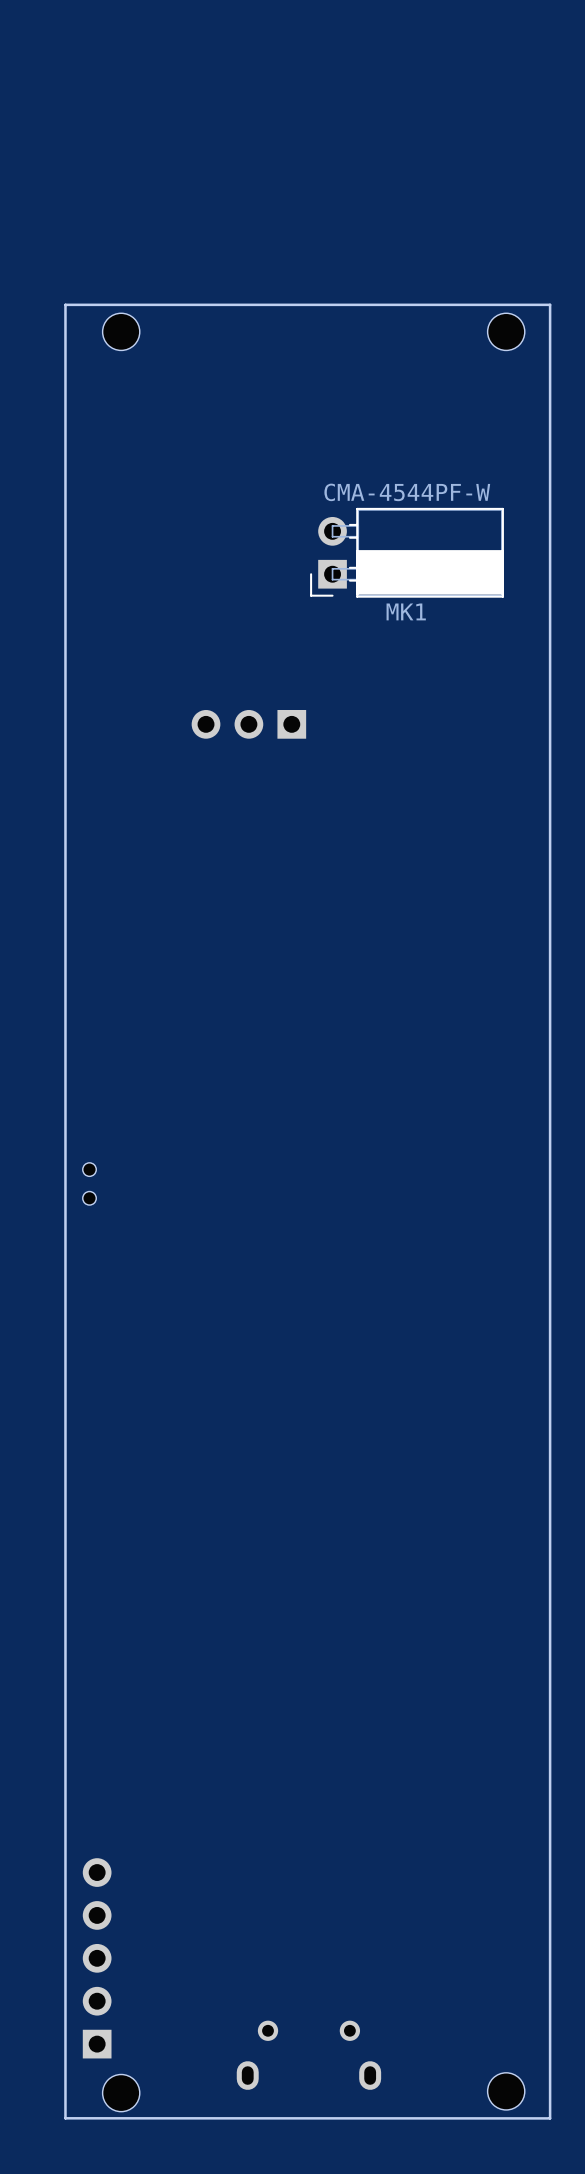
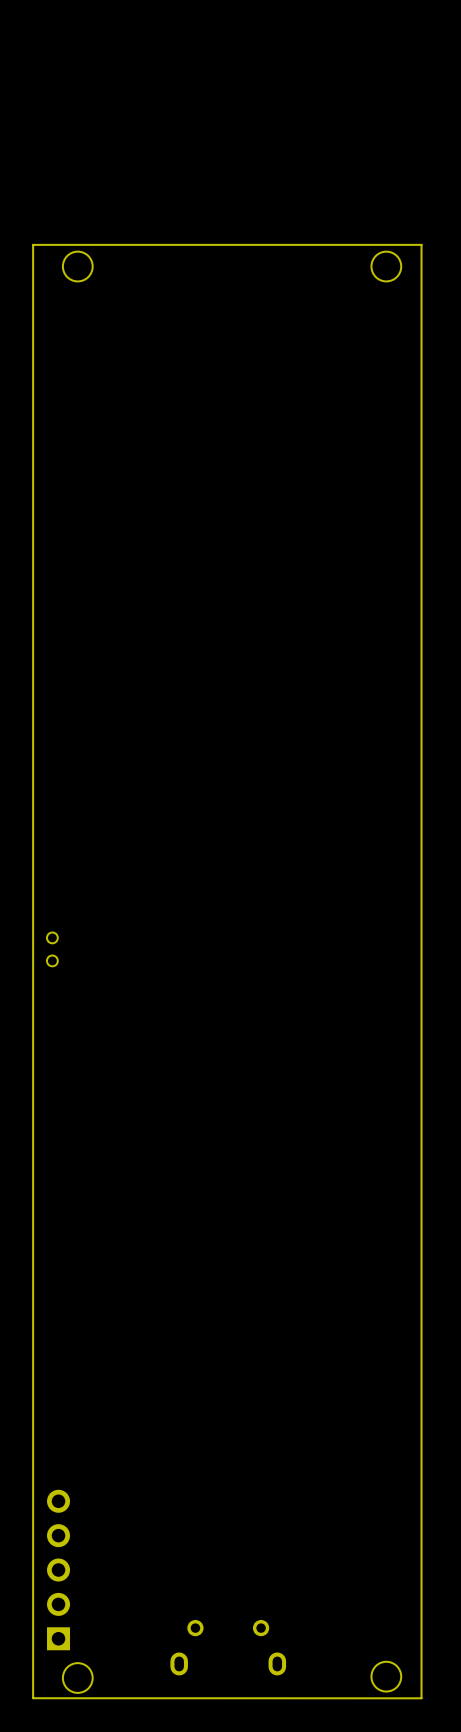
MK1: CMA-4544PF-W (407, 552) -> none
part: (248, 724) -> none

